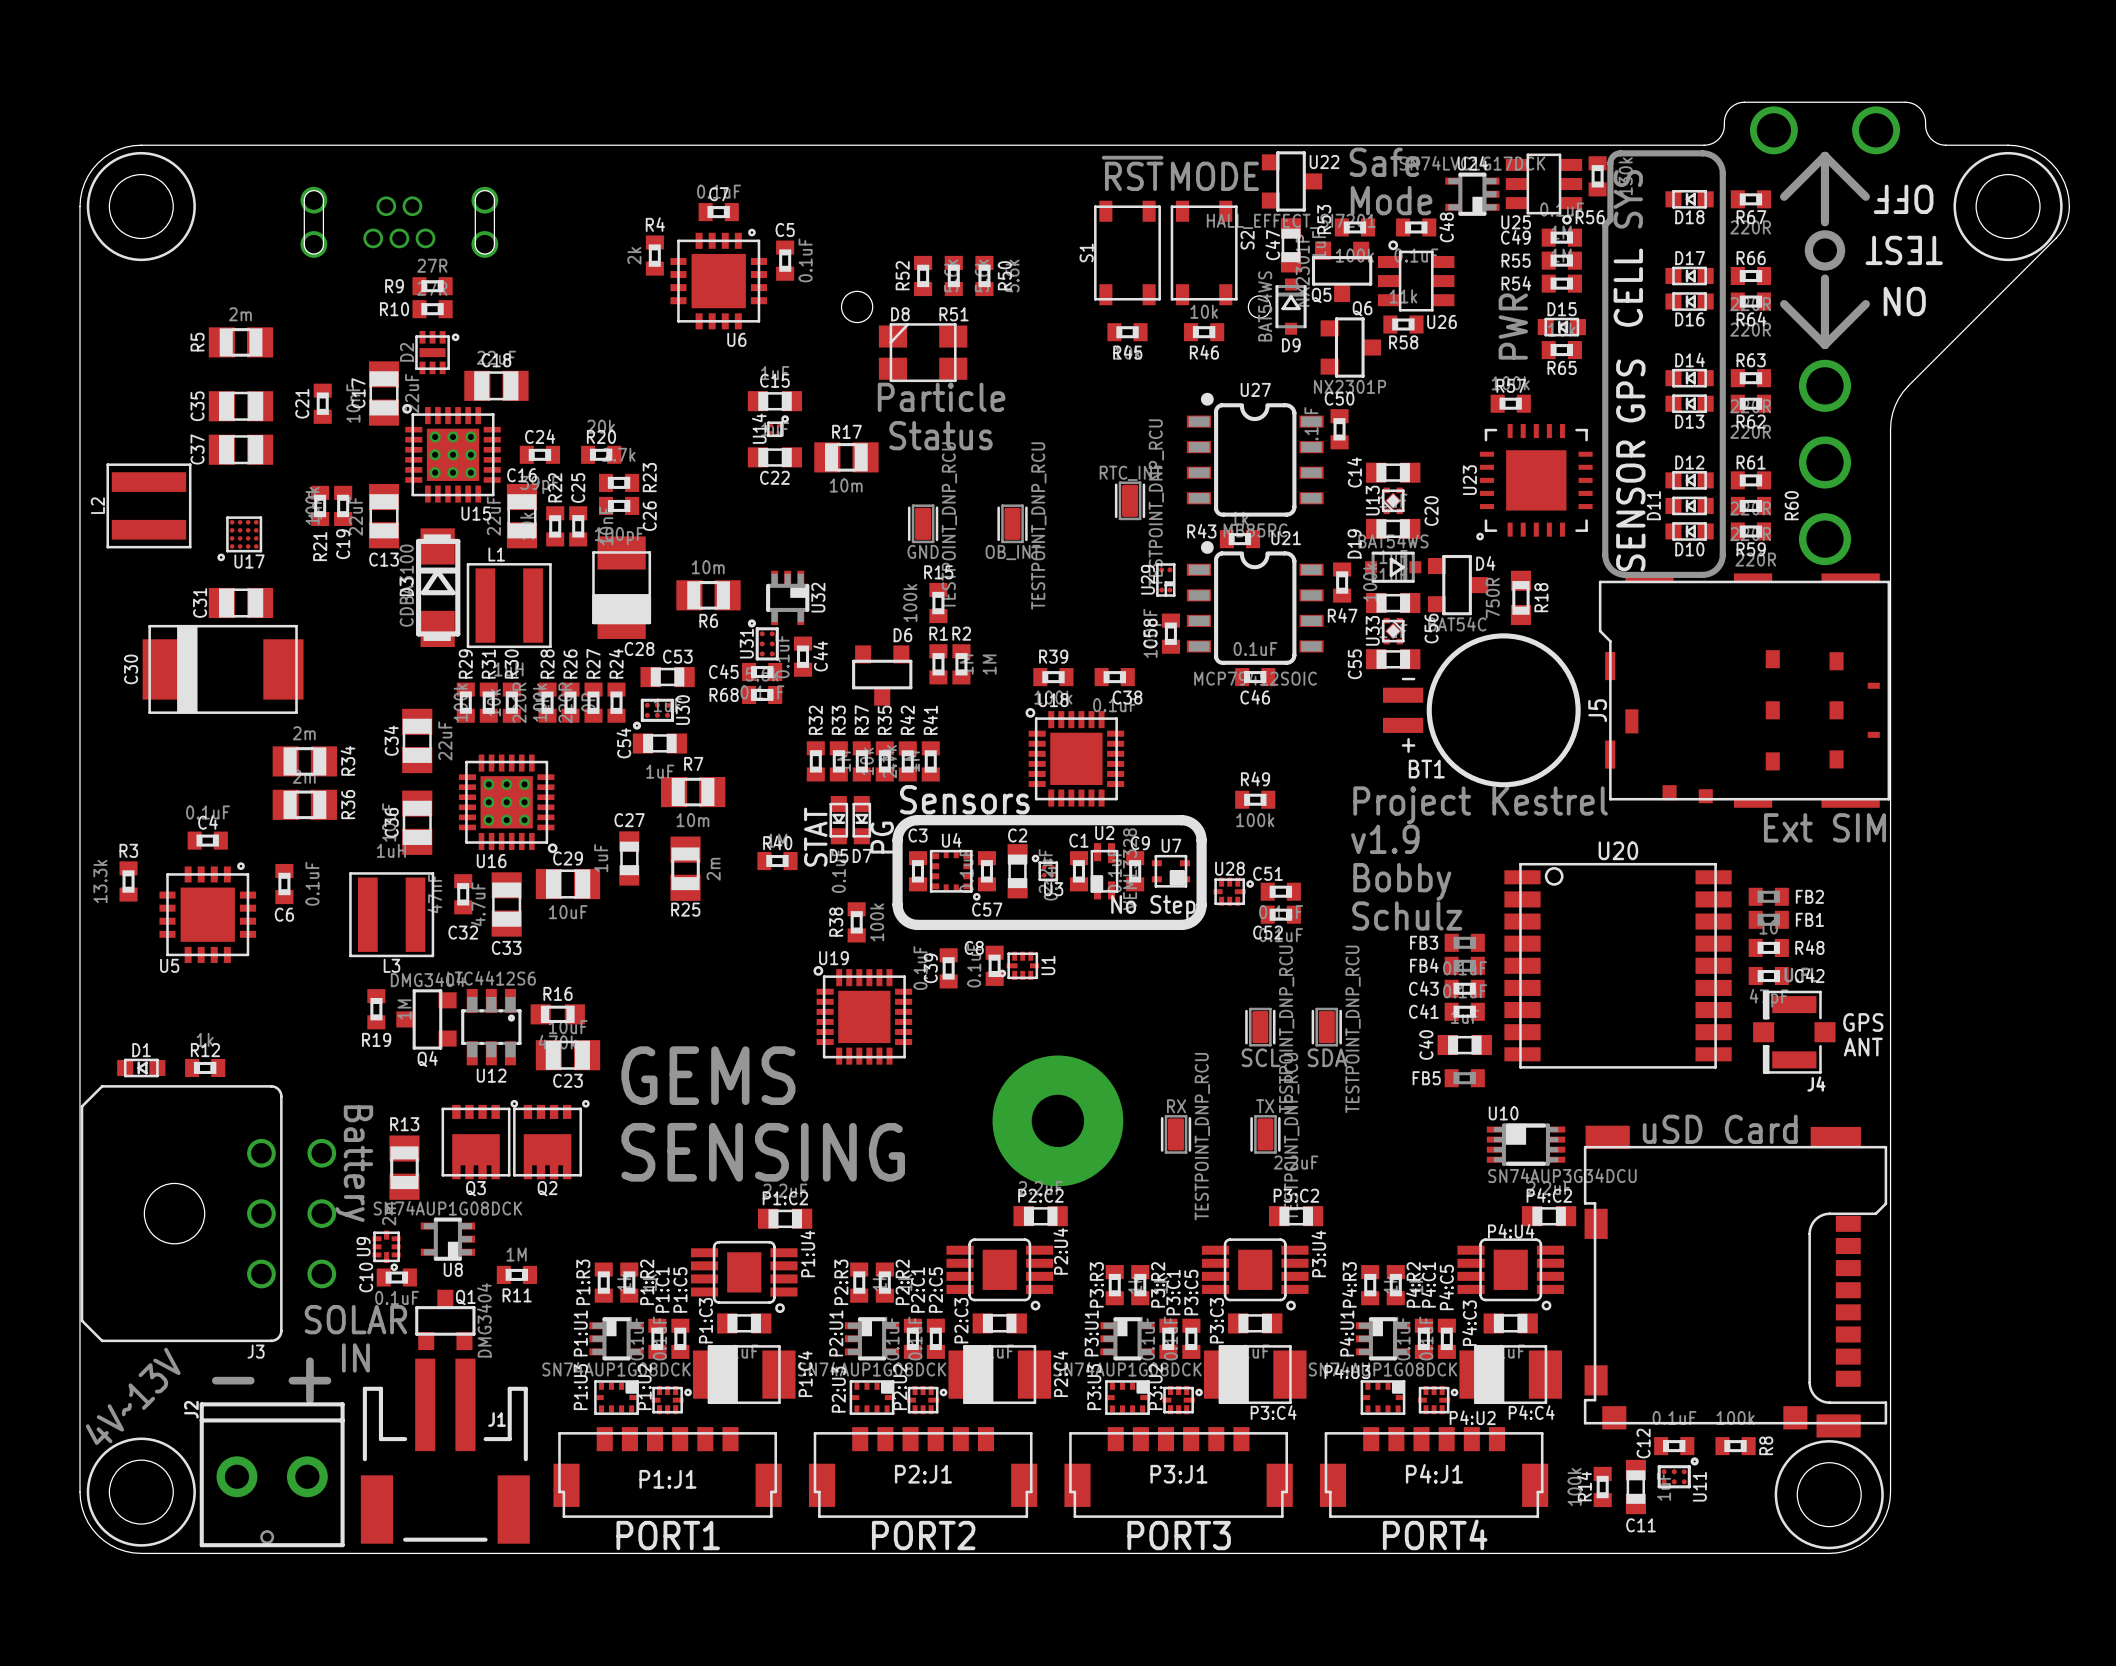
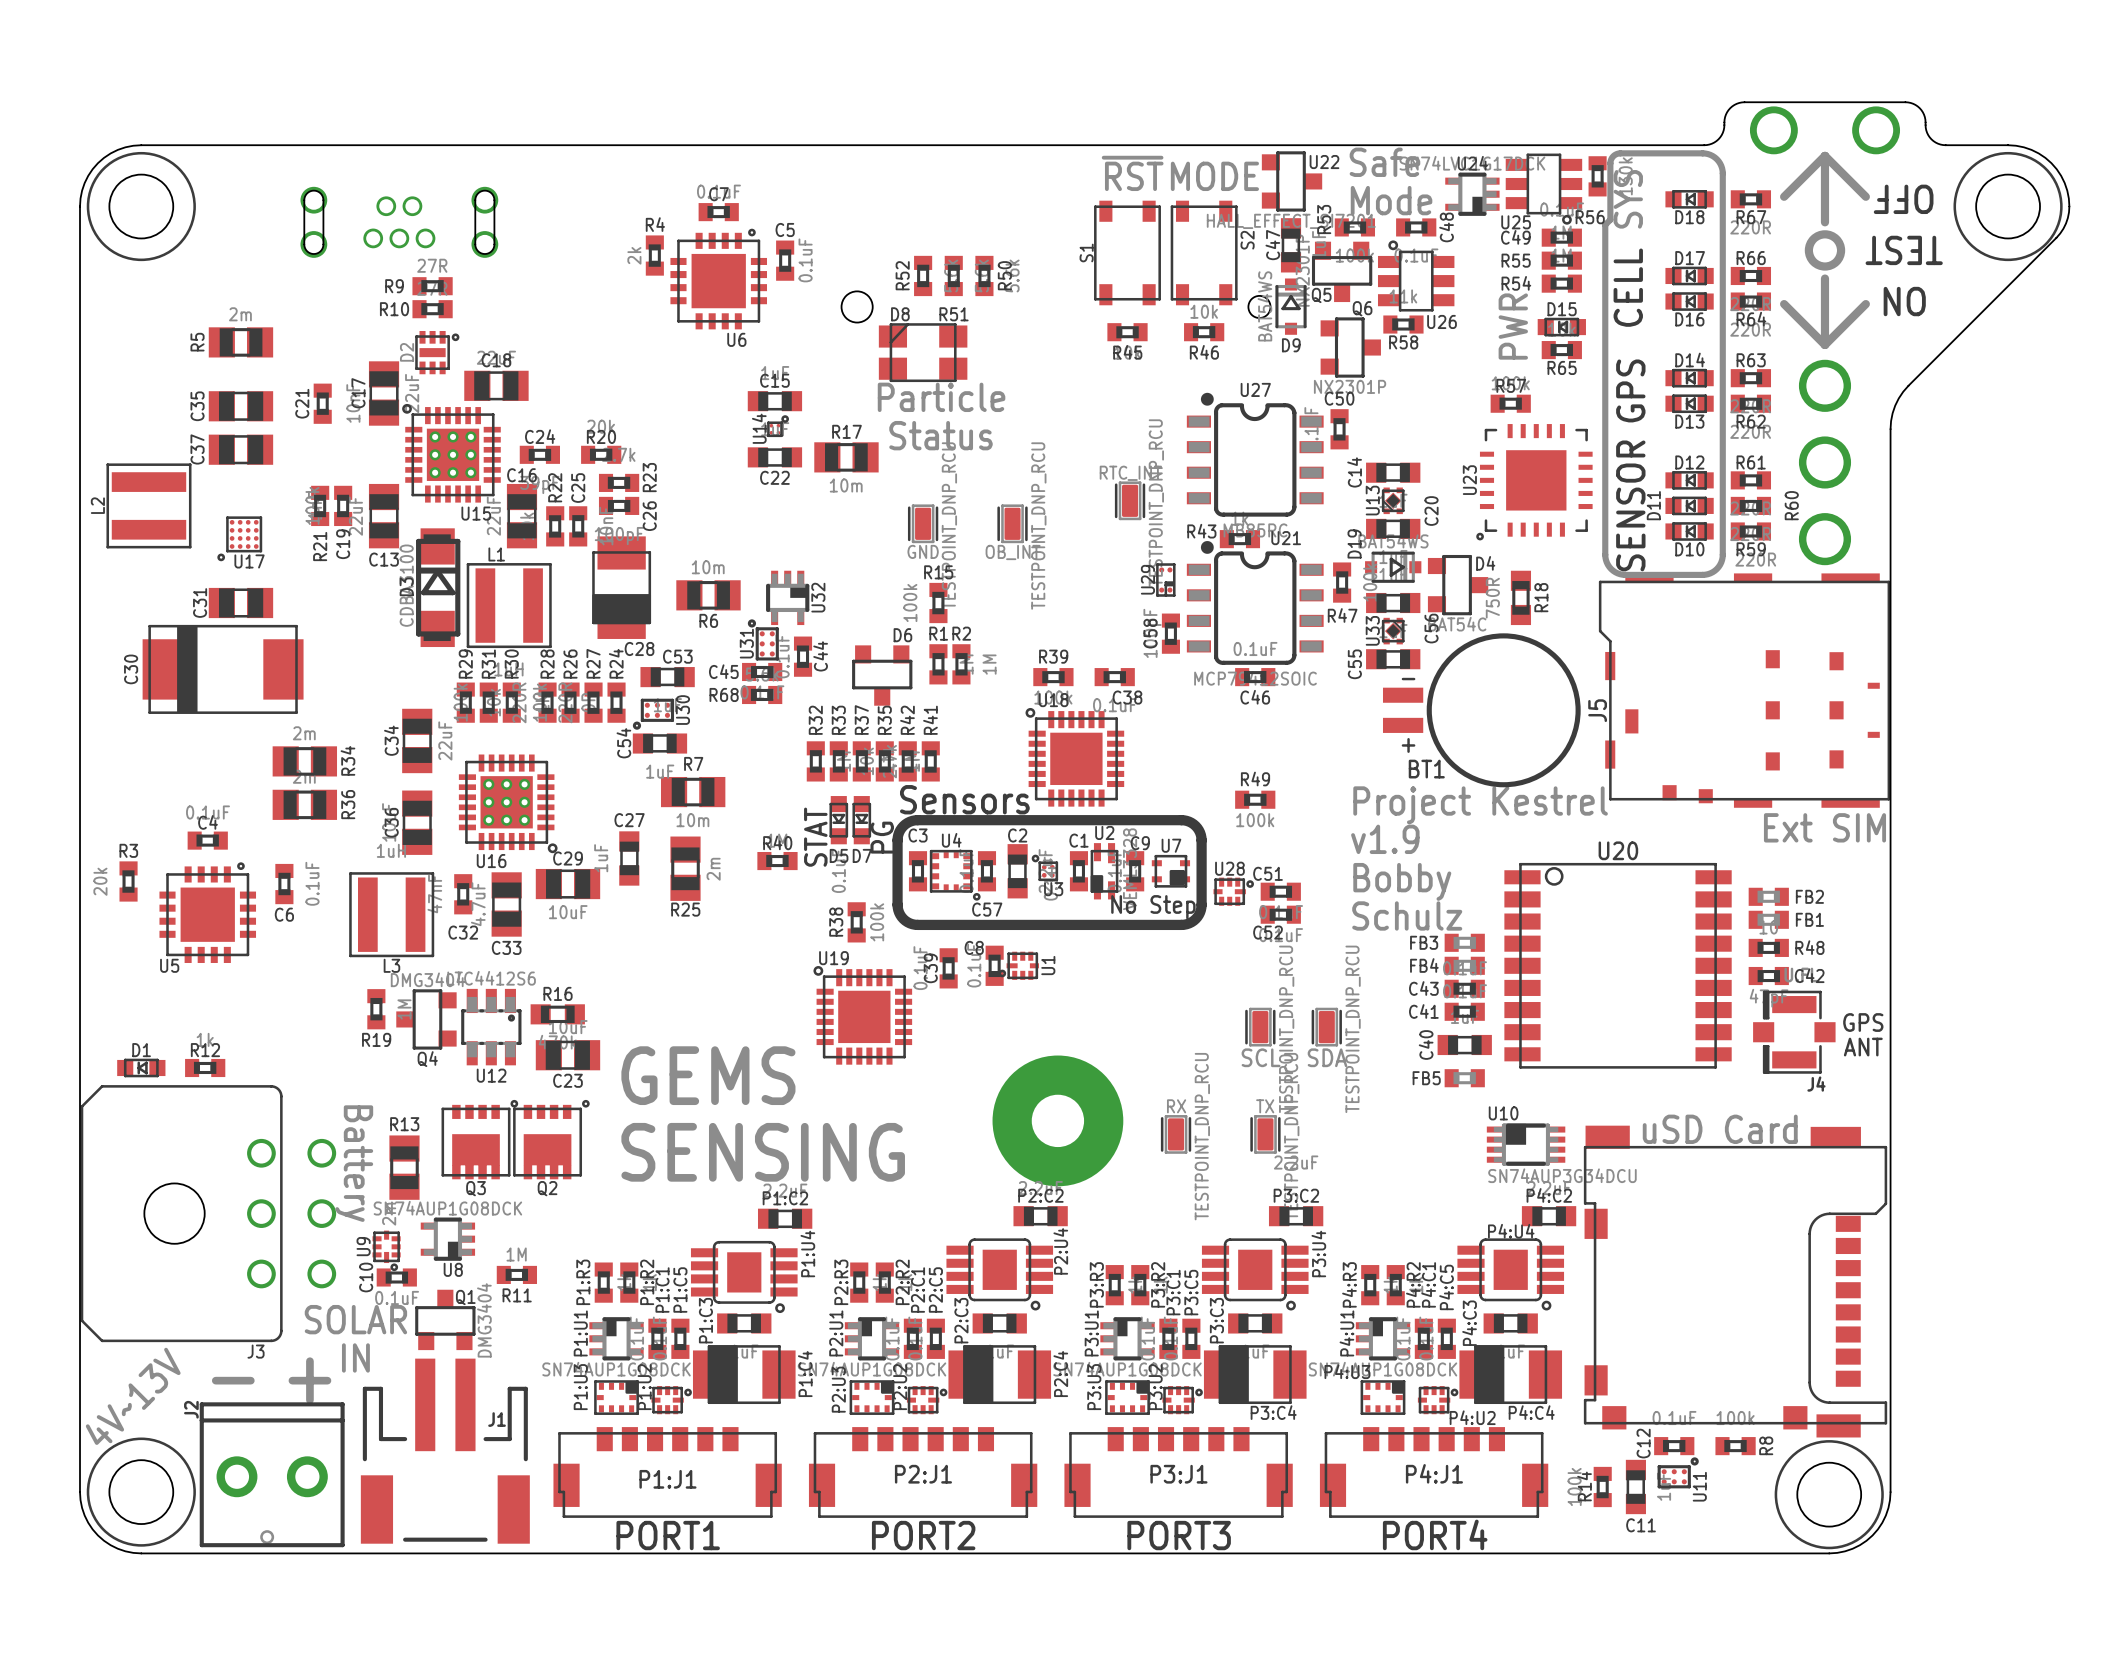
R3 value: 13.3k (100, 881) -> 20k (100, 881)

